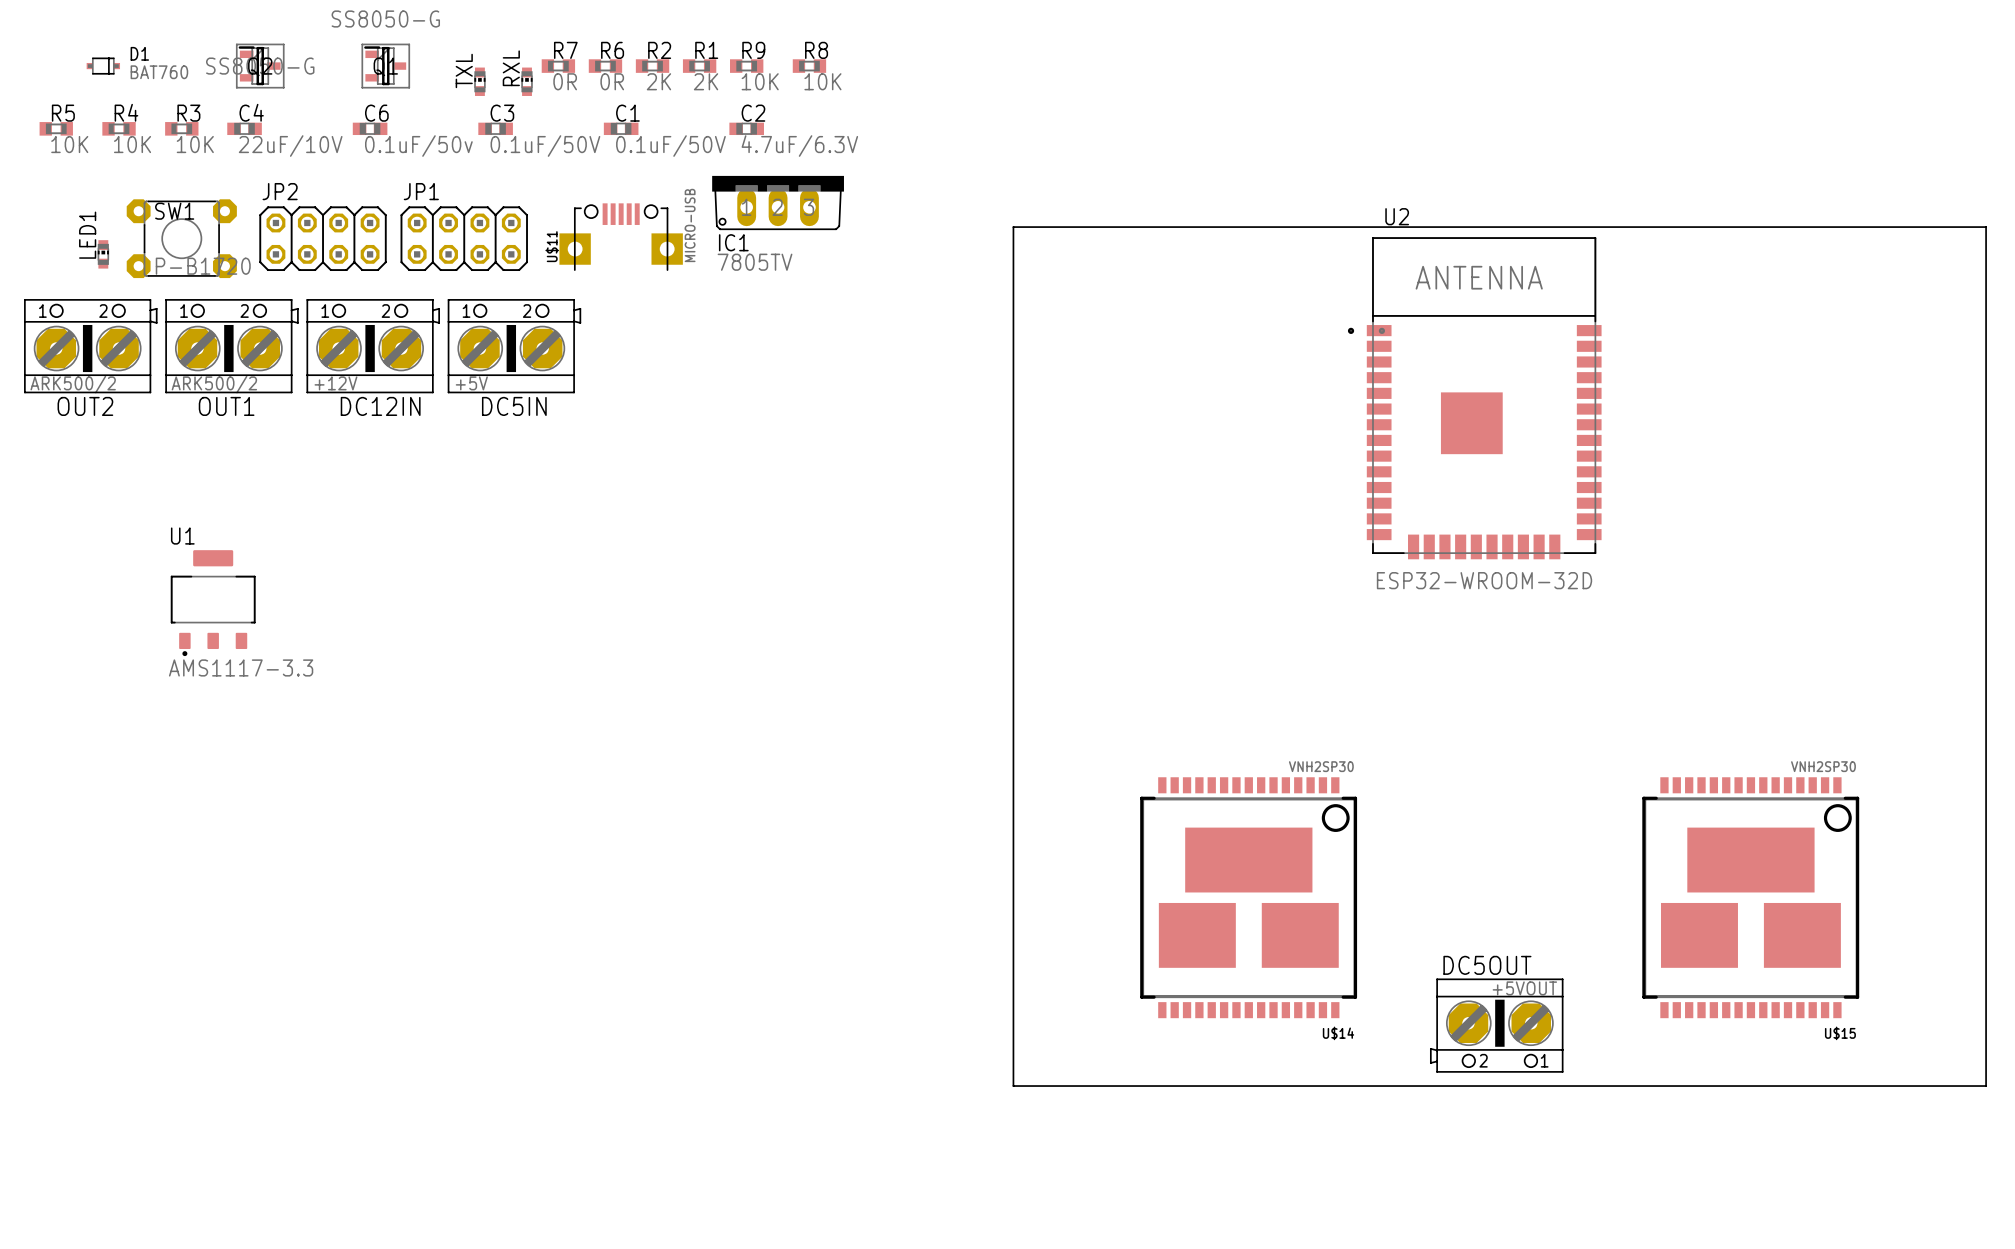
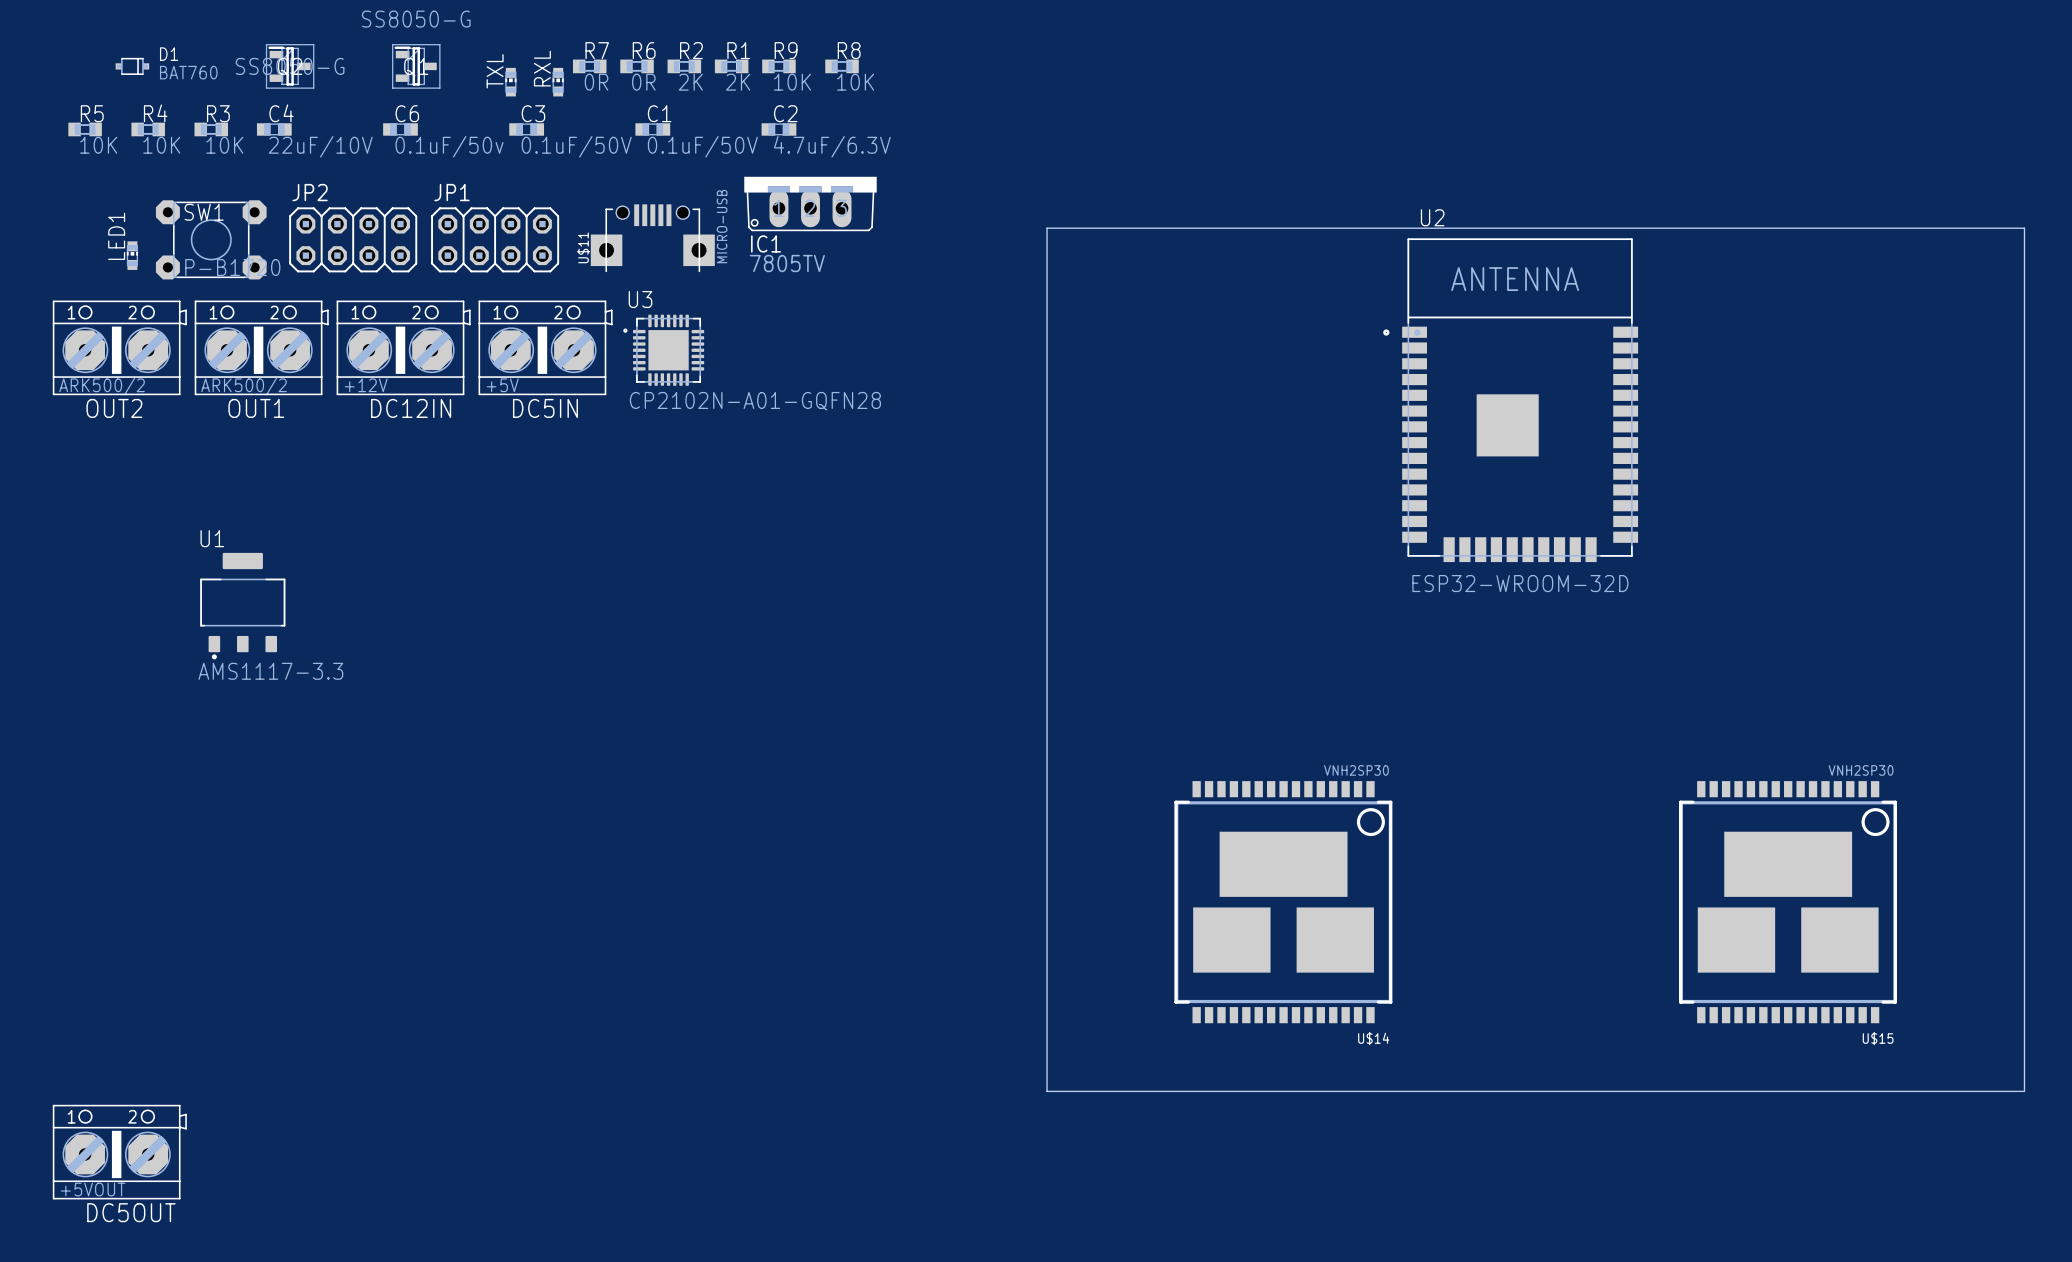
U3: none -> CP2102N-A01-GQFN28 (663, 350)
DC5OUT name position: DC5OUT (1487, 965) -> DC5OUT (131, 1212)
DC5OUT footprint: [1430, 978, 1564, 1073] -> [52, 1104, 187, 1200]
DC5OUT value position: +5VOUT (1524, 988) -> +5VOUT (93, 1189)

